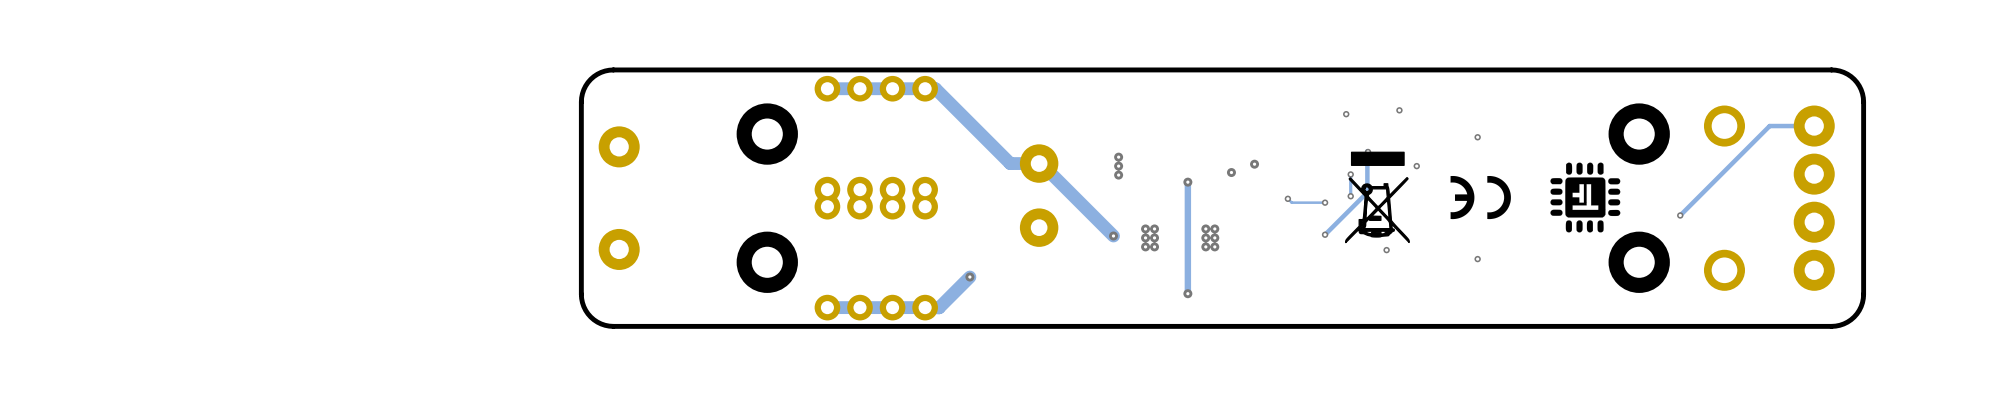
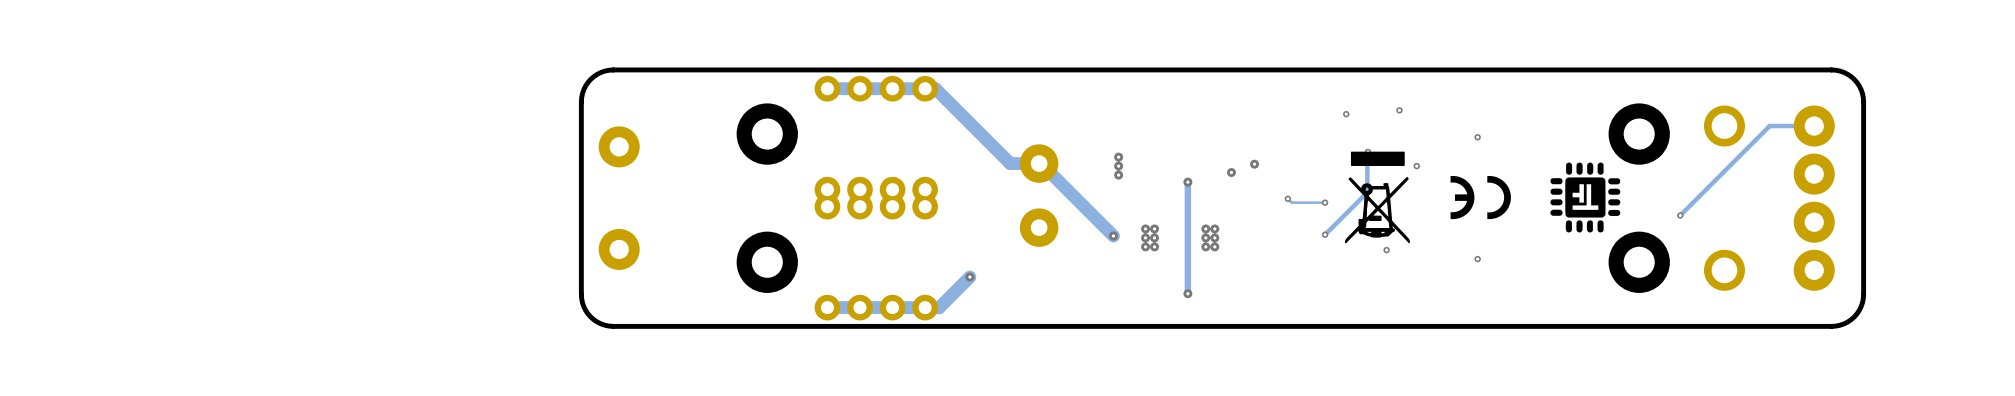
track: (1350, 174) (1350, 196) -> none
via: (1350, 174) -> none
via: (1350, 196) -> none

